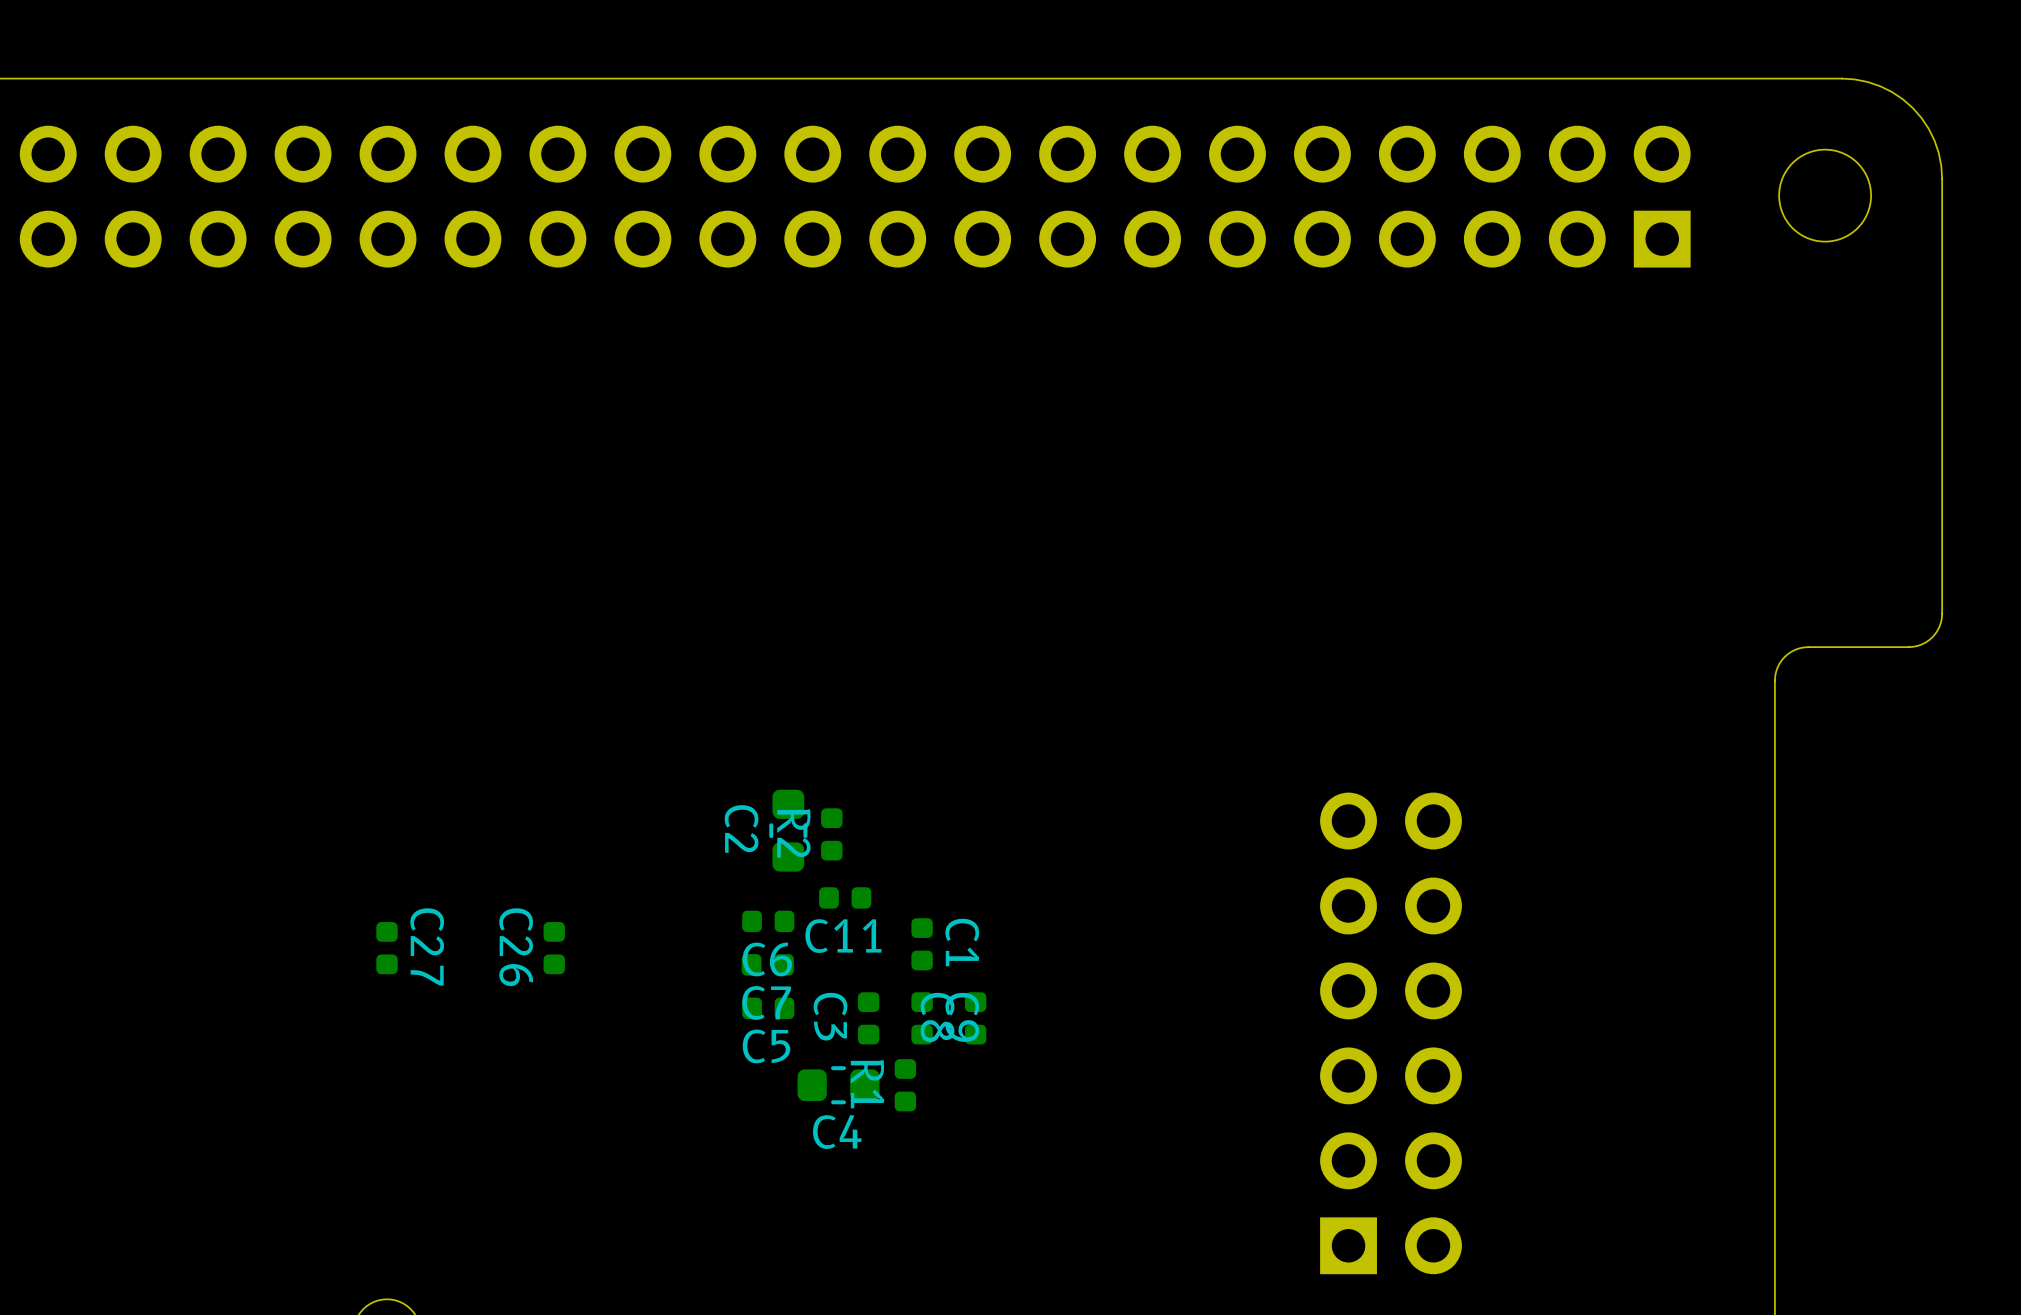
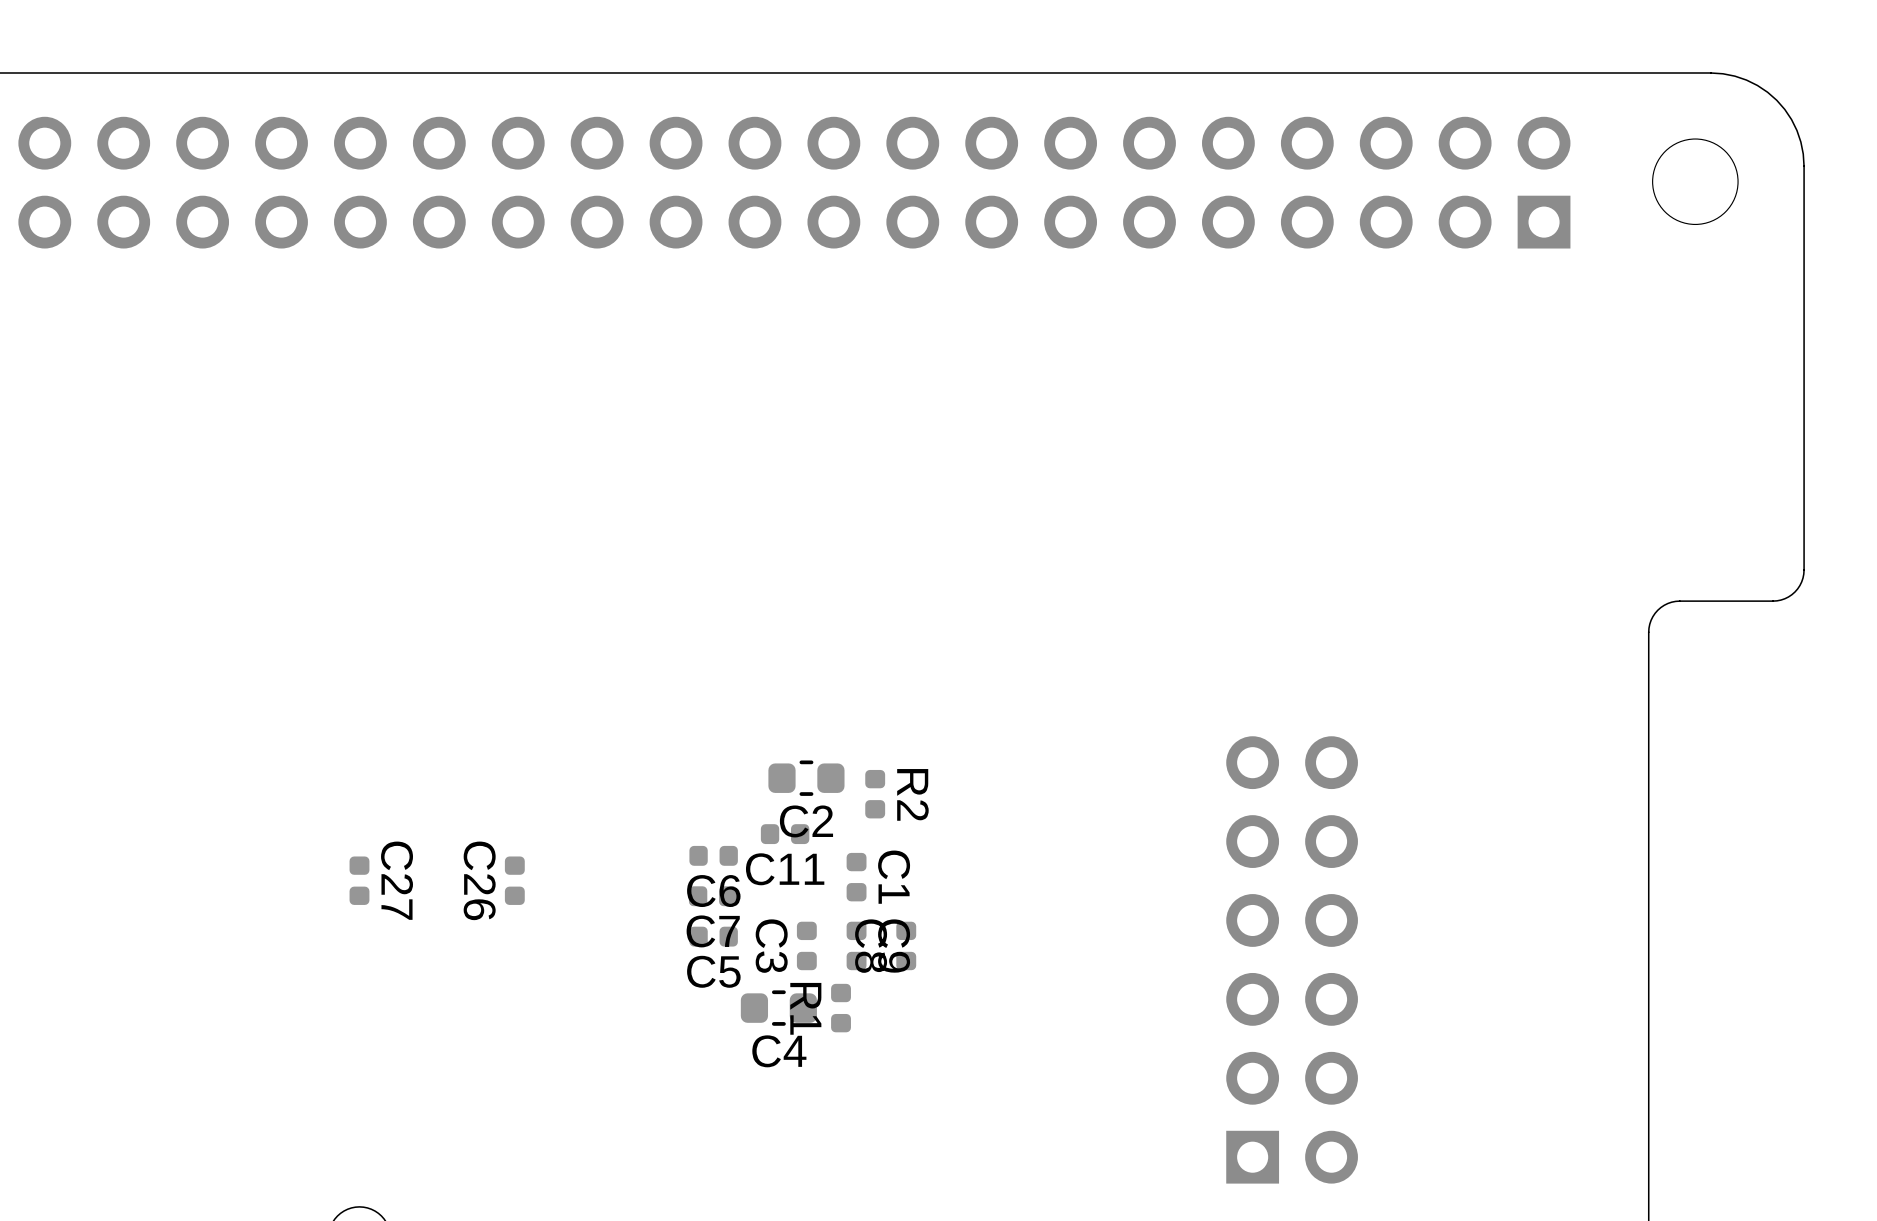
C2 name position: C2 (741, 828) -> C2 (806, 821)
C2 rotation: 0° (788, 830) -> 90° clockwise (806, 778)
C2 position: (788, 830) -> (806, 778)
R2 name position: R2 (793, 833) -> R2 (912, 794)
R2 position: (831, 834) -> (875, 794)

